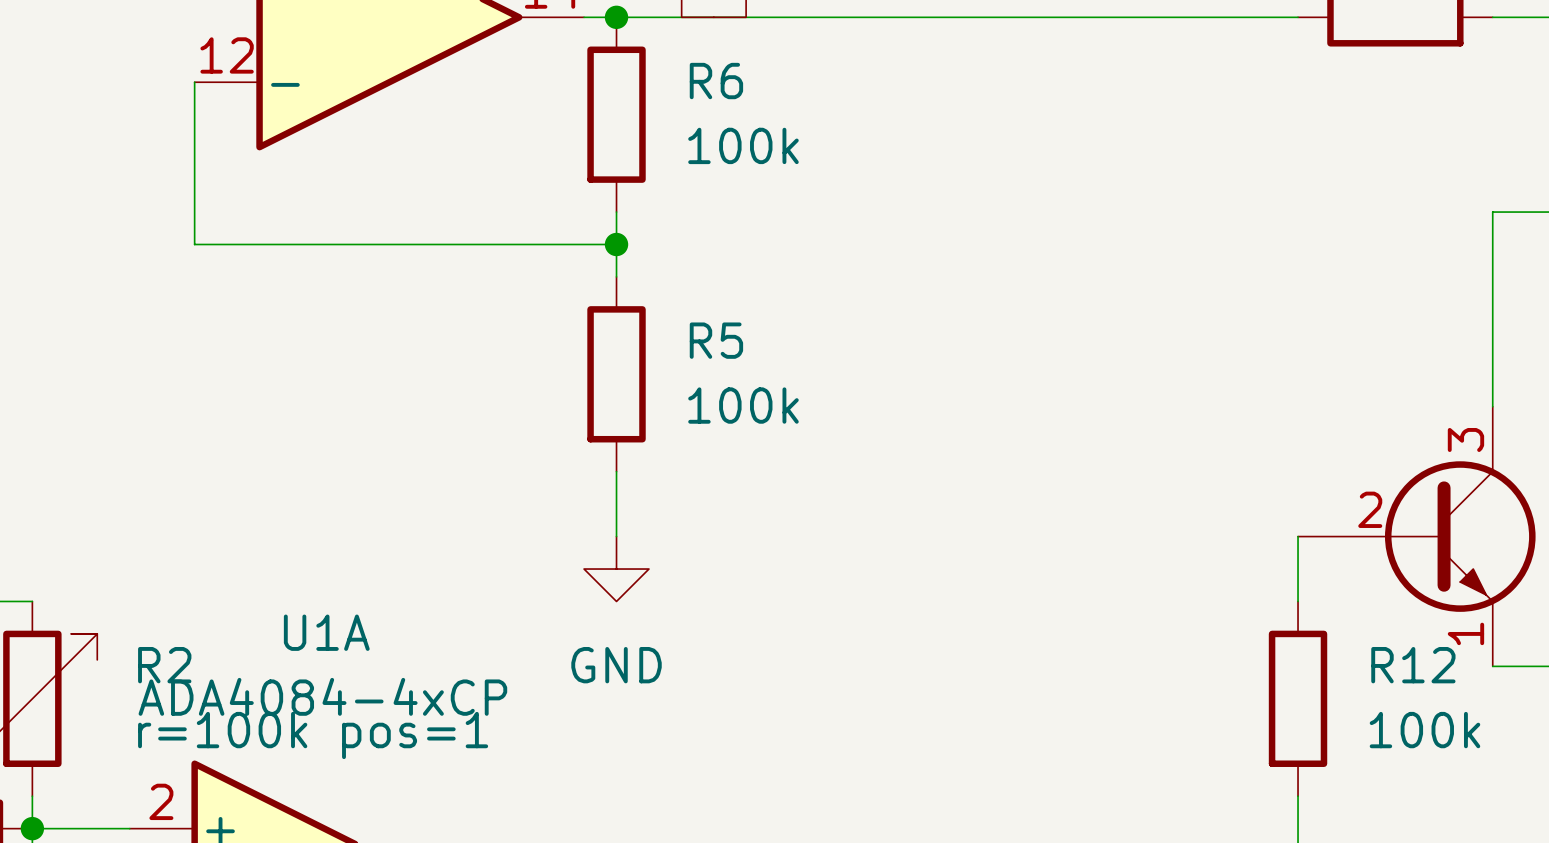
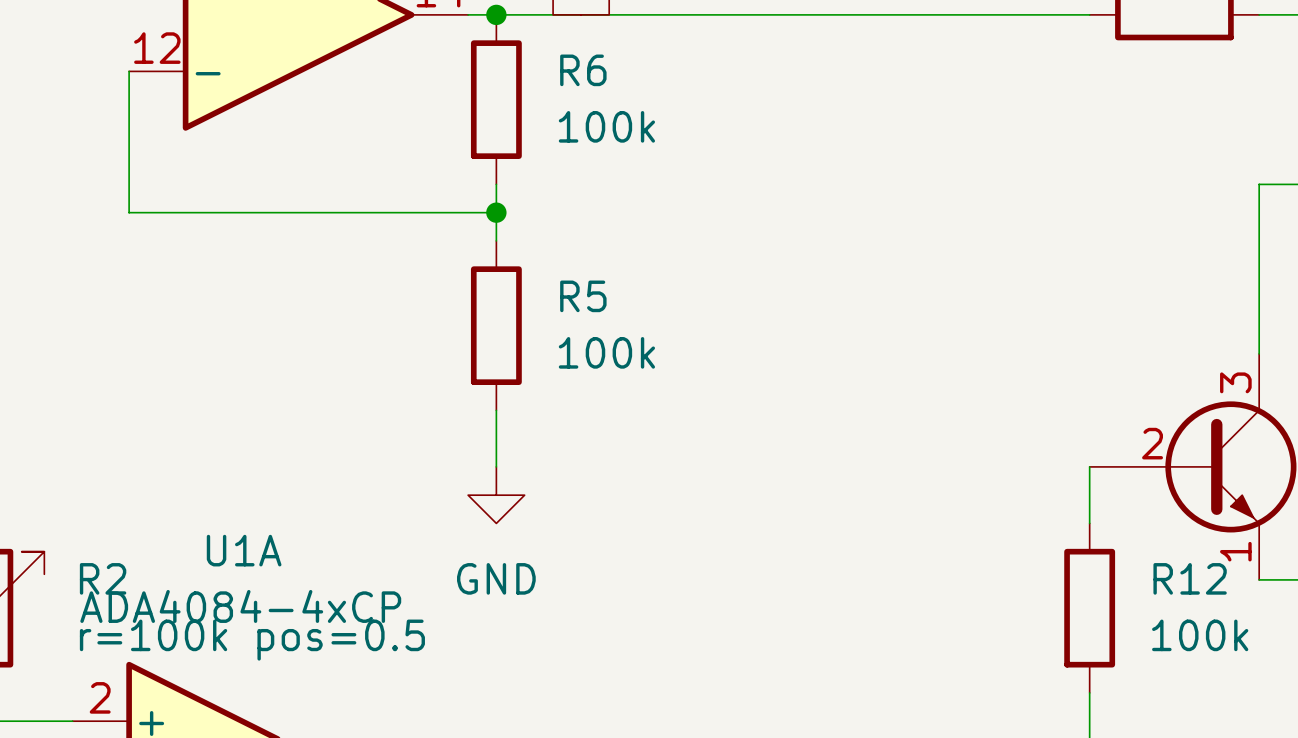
R2 value: r=100k pos=1 (313, 735) -> r=100k pos=0.5 (252, 640)

